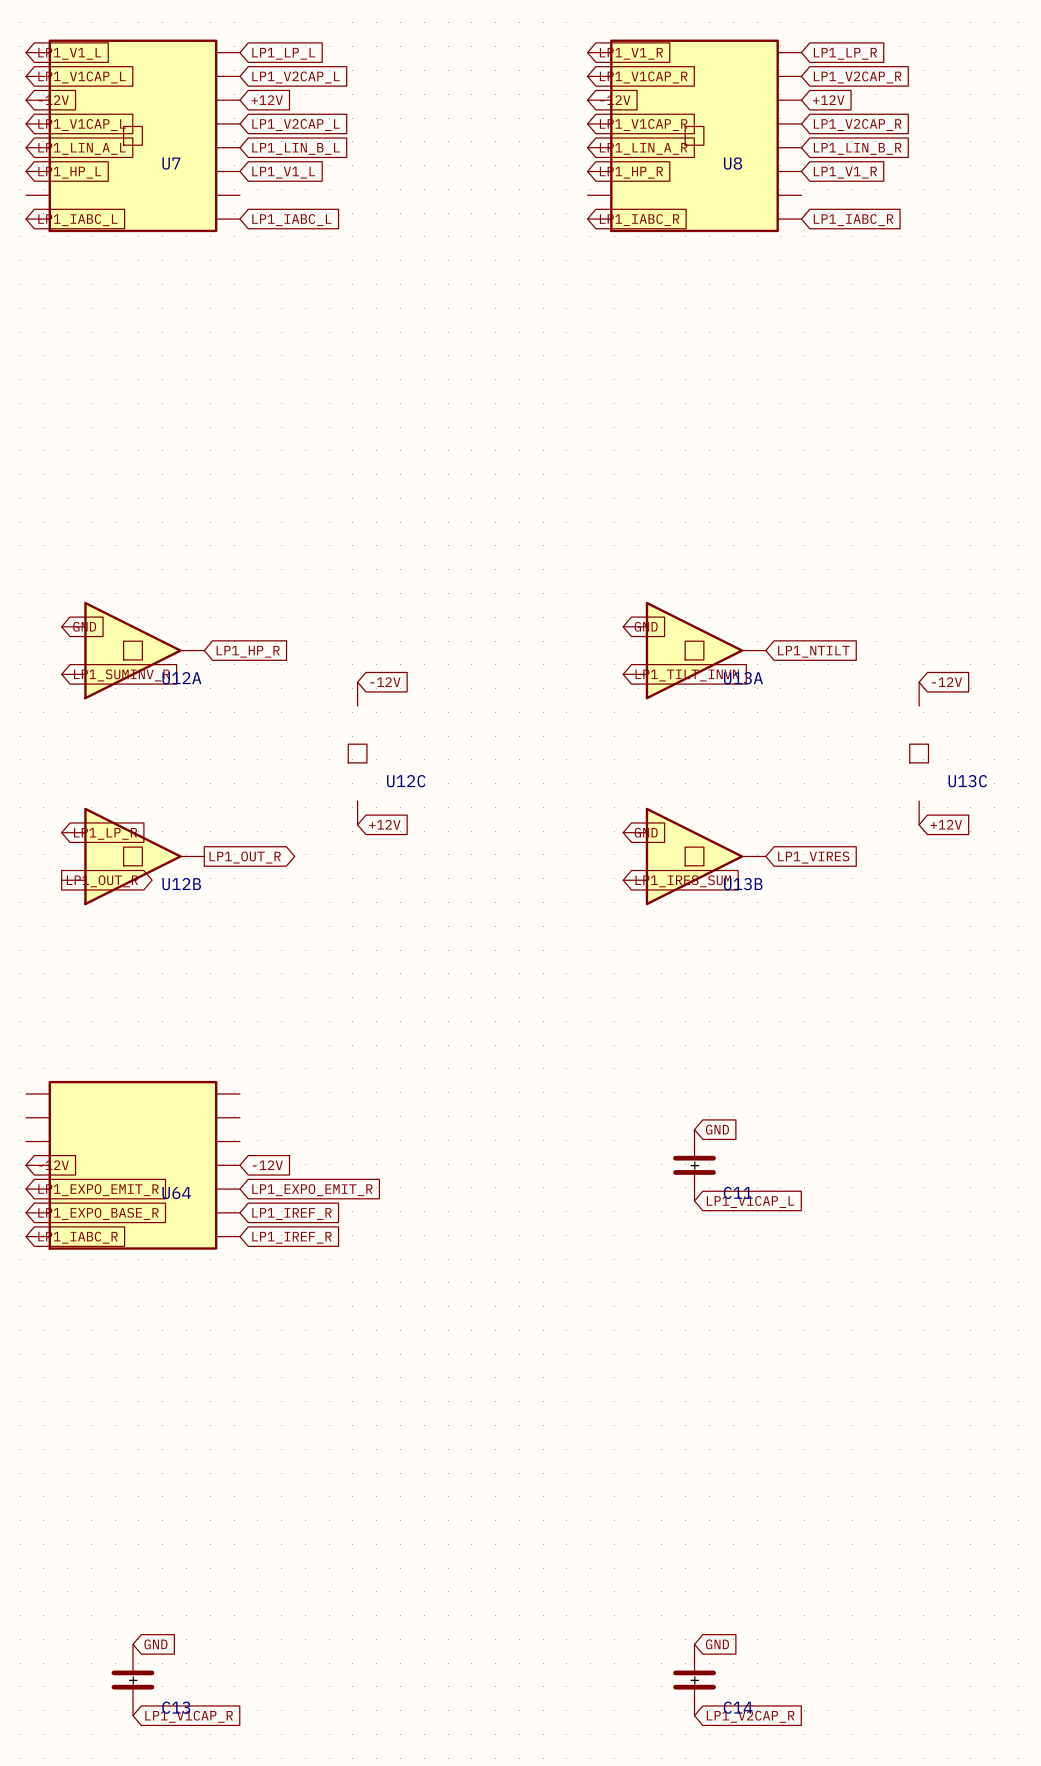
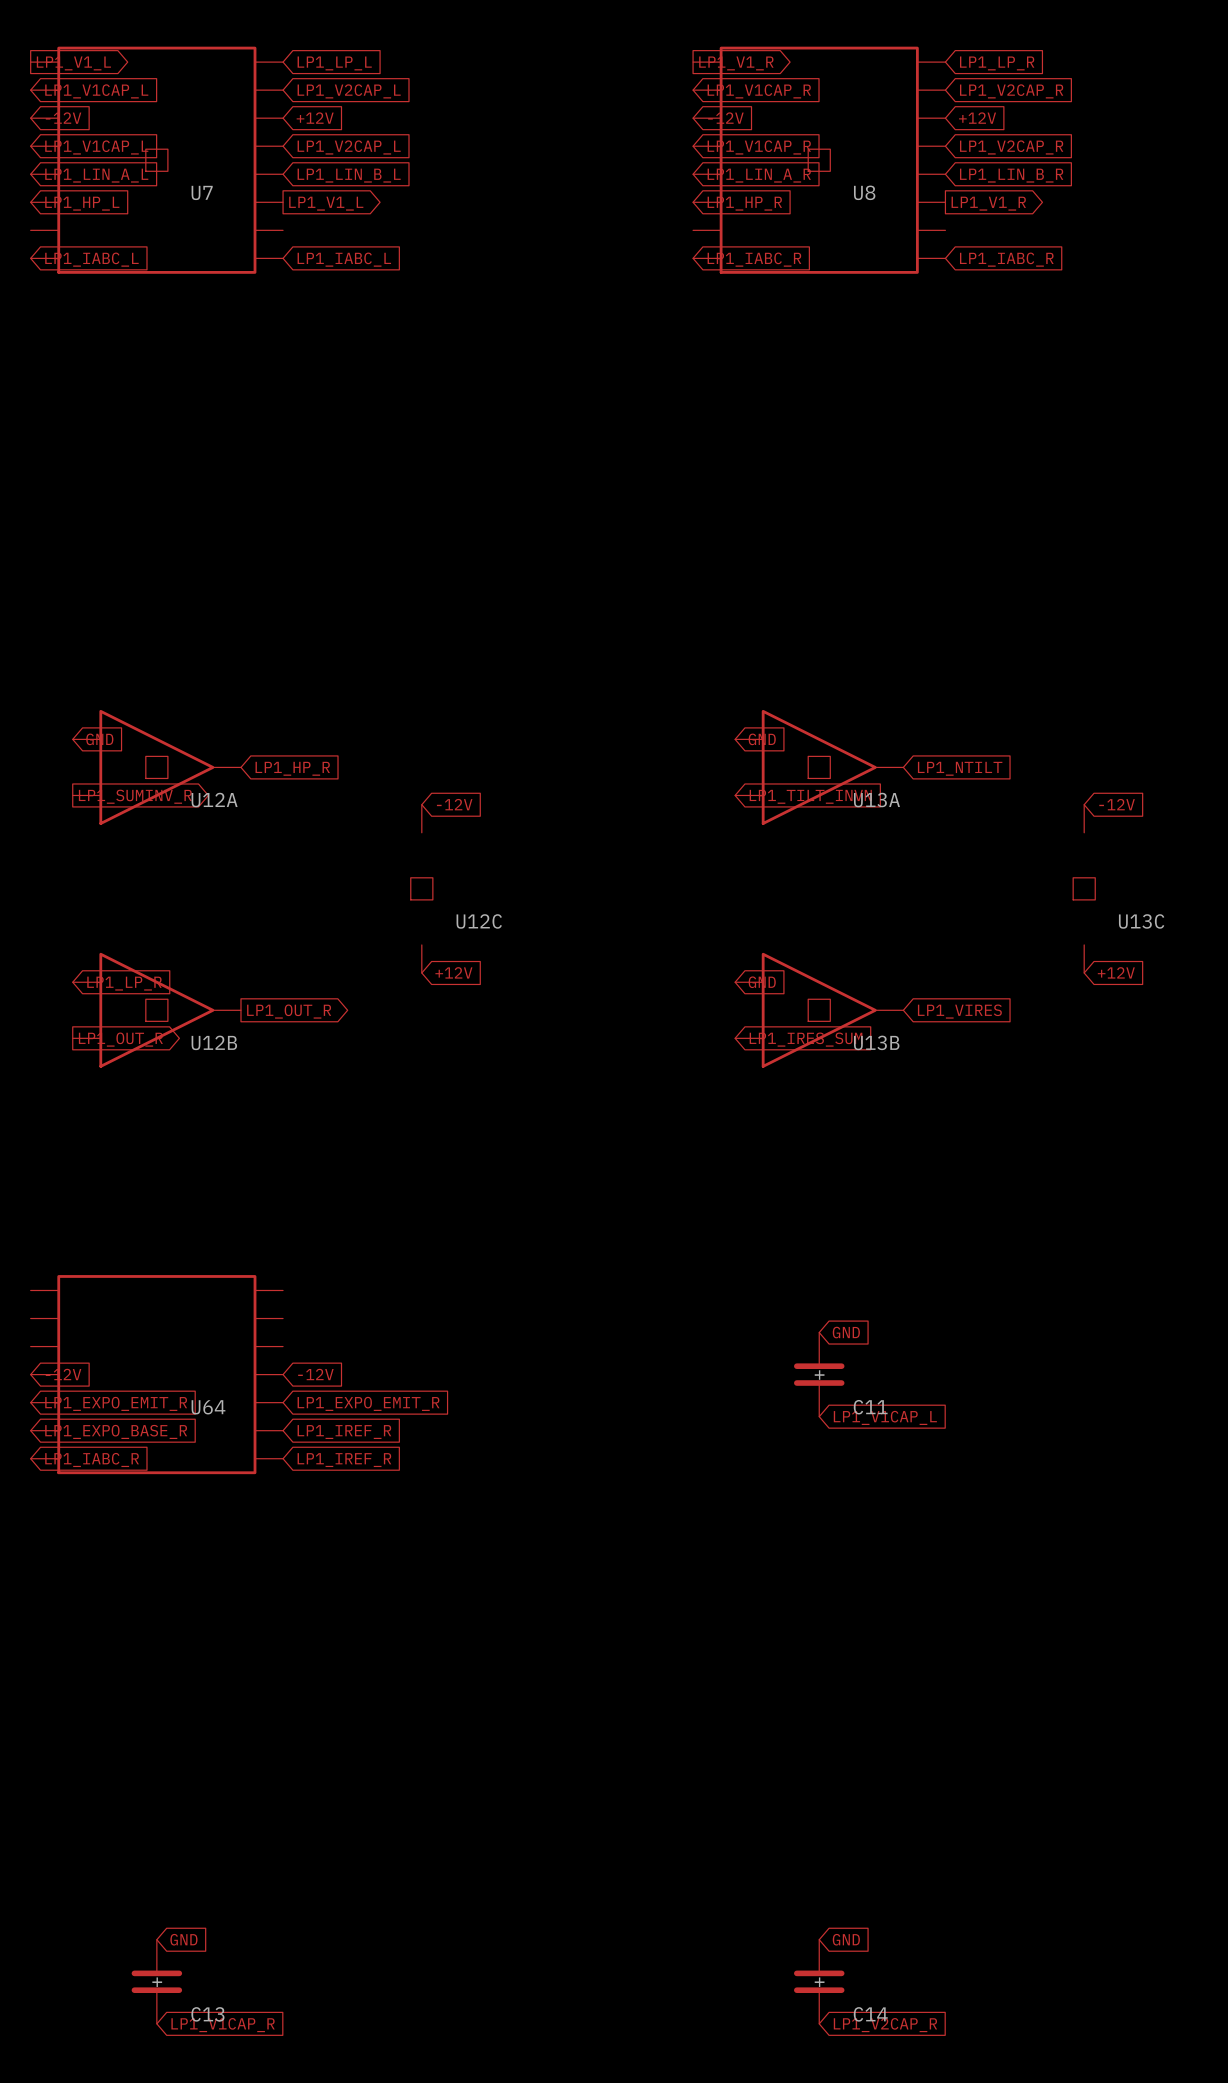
global label shape: input (69, 53) -> output (73, 63)
global label shape: input (631, 53) -> output (736, 63)
global label shape: input (283, 172) -> output (326, 203)
global label shape: input (845, 172) -> output (988, 203)
global label shape: input (121, 675) -> output (135, 796)

